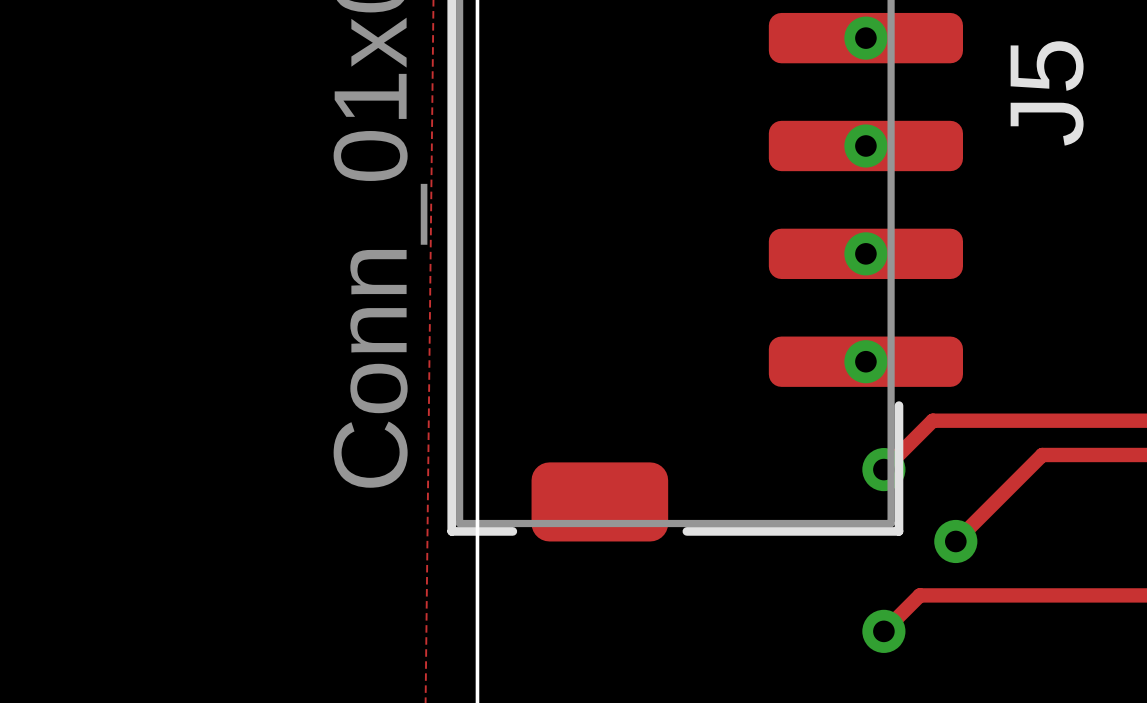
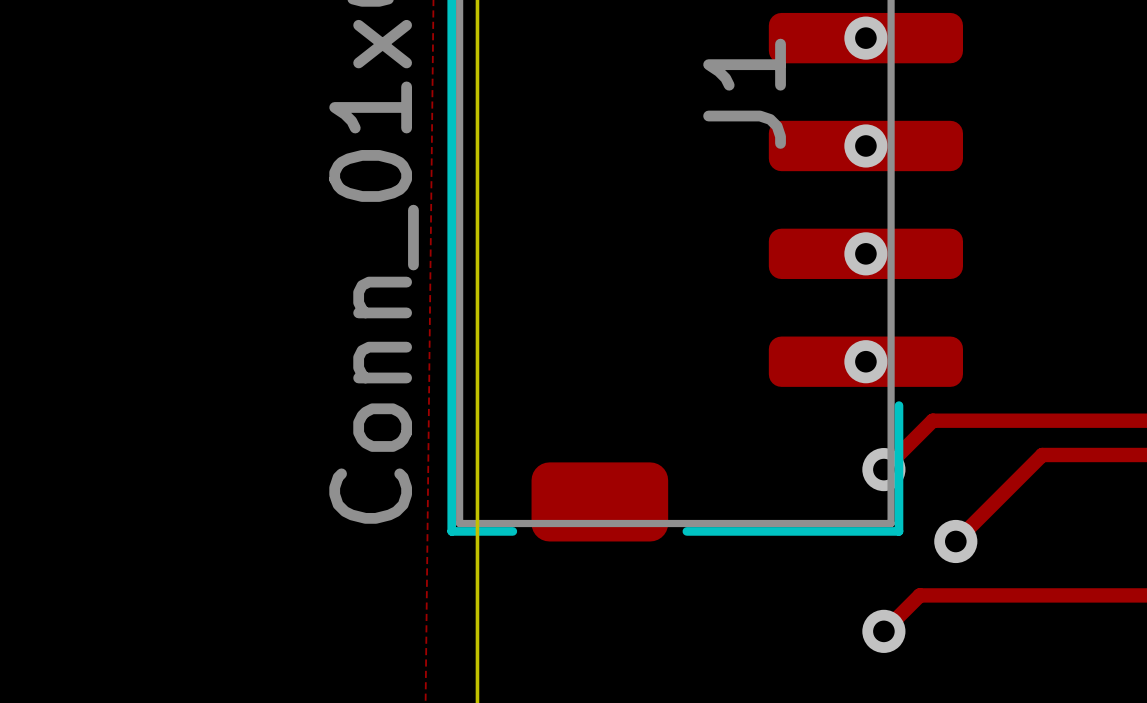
J5 name: J5 (1047, 93) -> J1 (744, 93)

